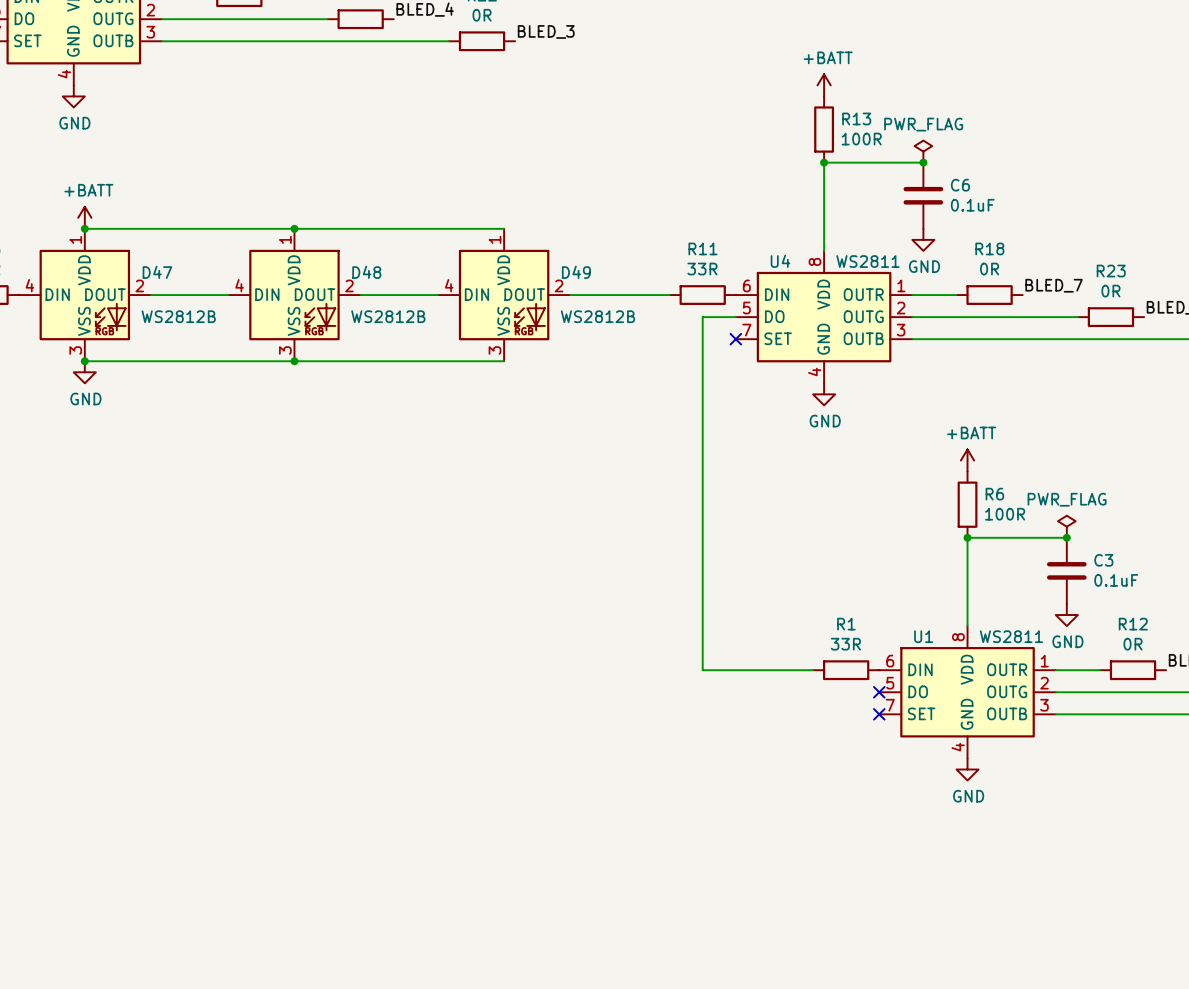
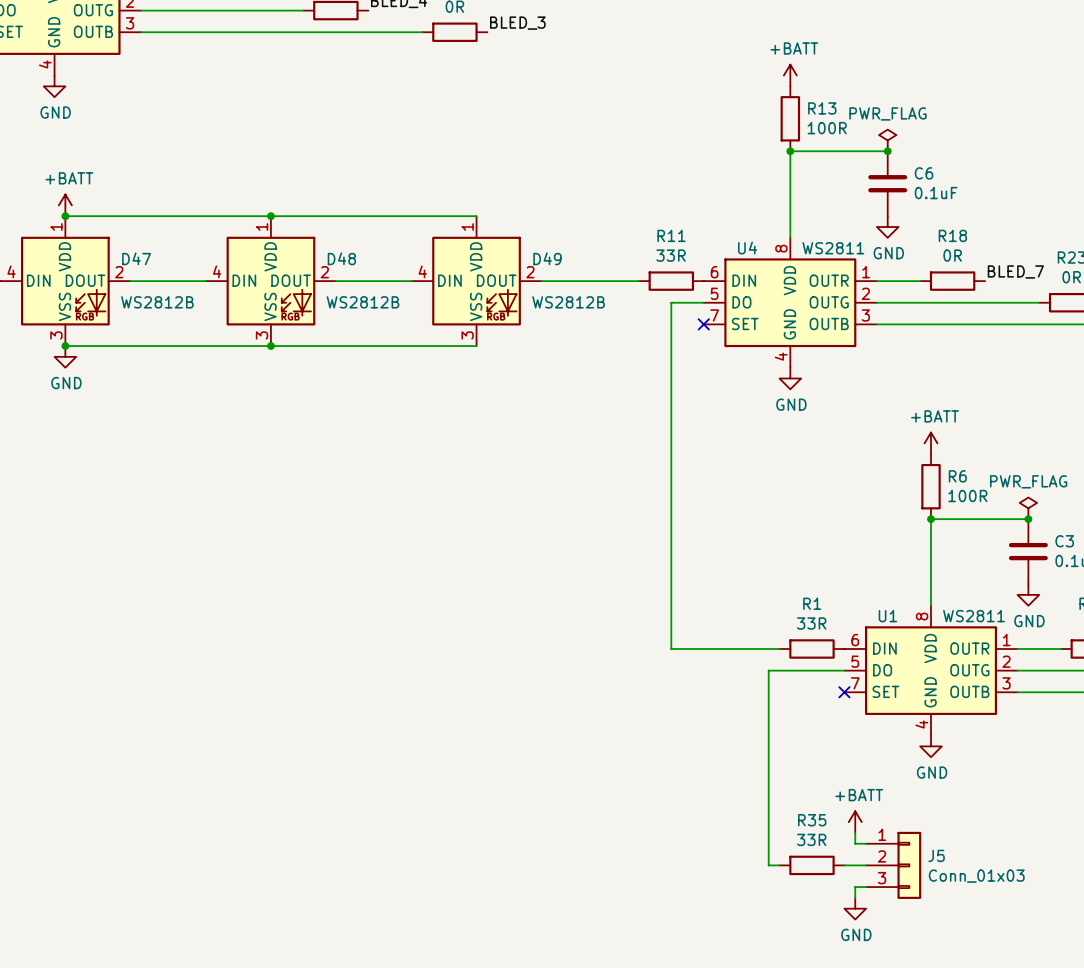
wire: none -> (844, 670) (768, 670) (768, 865) (779, 865)
no-connect mark: (879, 692) -> none
power symbol: none -> +BATT (855, 822)
wire: none -> (855, 832) (855, 843) (866, 843)
R35: none -> 33R (811, 865)
wire: none -> (844, 865) (866, 865)
J5: none -> Conn_01x03 (893, 865)
wire: none -> (866, 887) (855, 887) (855, 897)
power symbol: none -> GND (855, 908)

